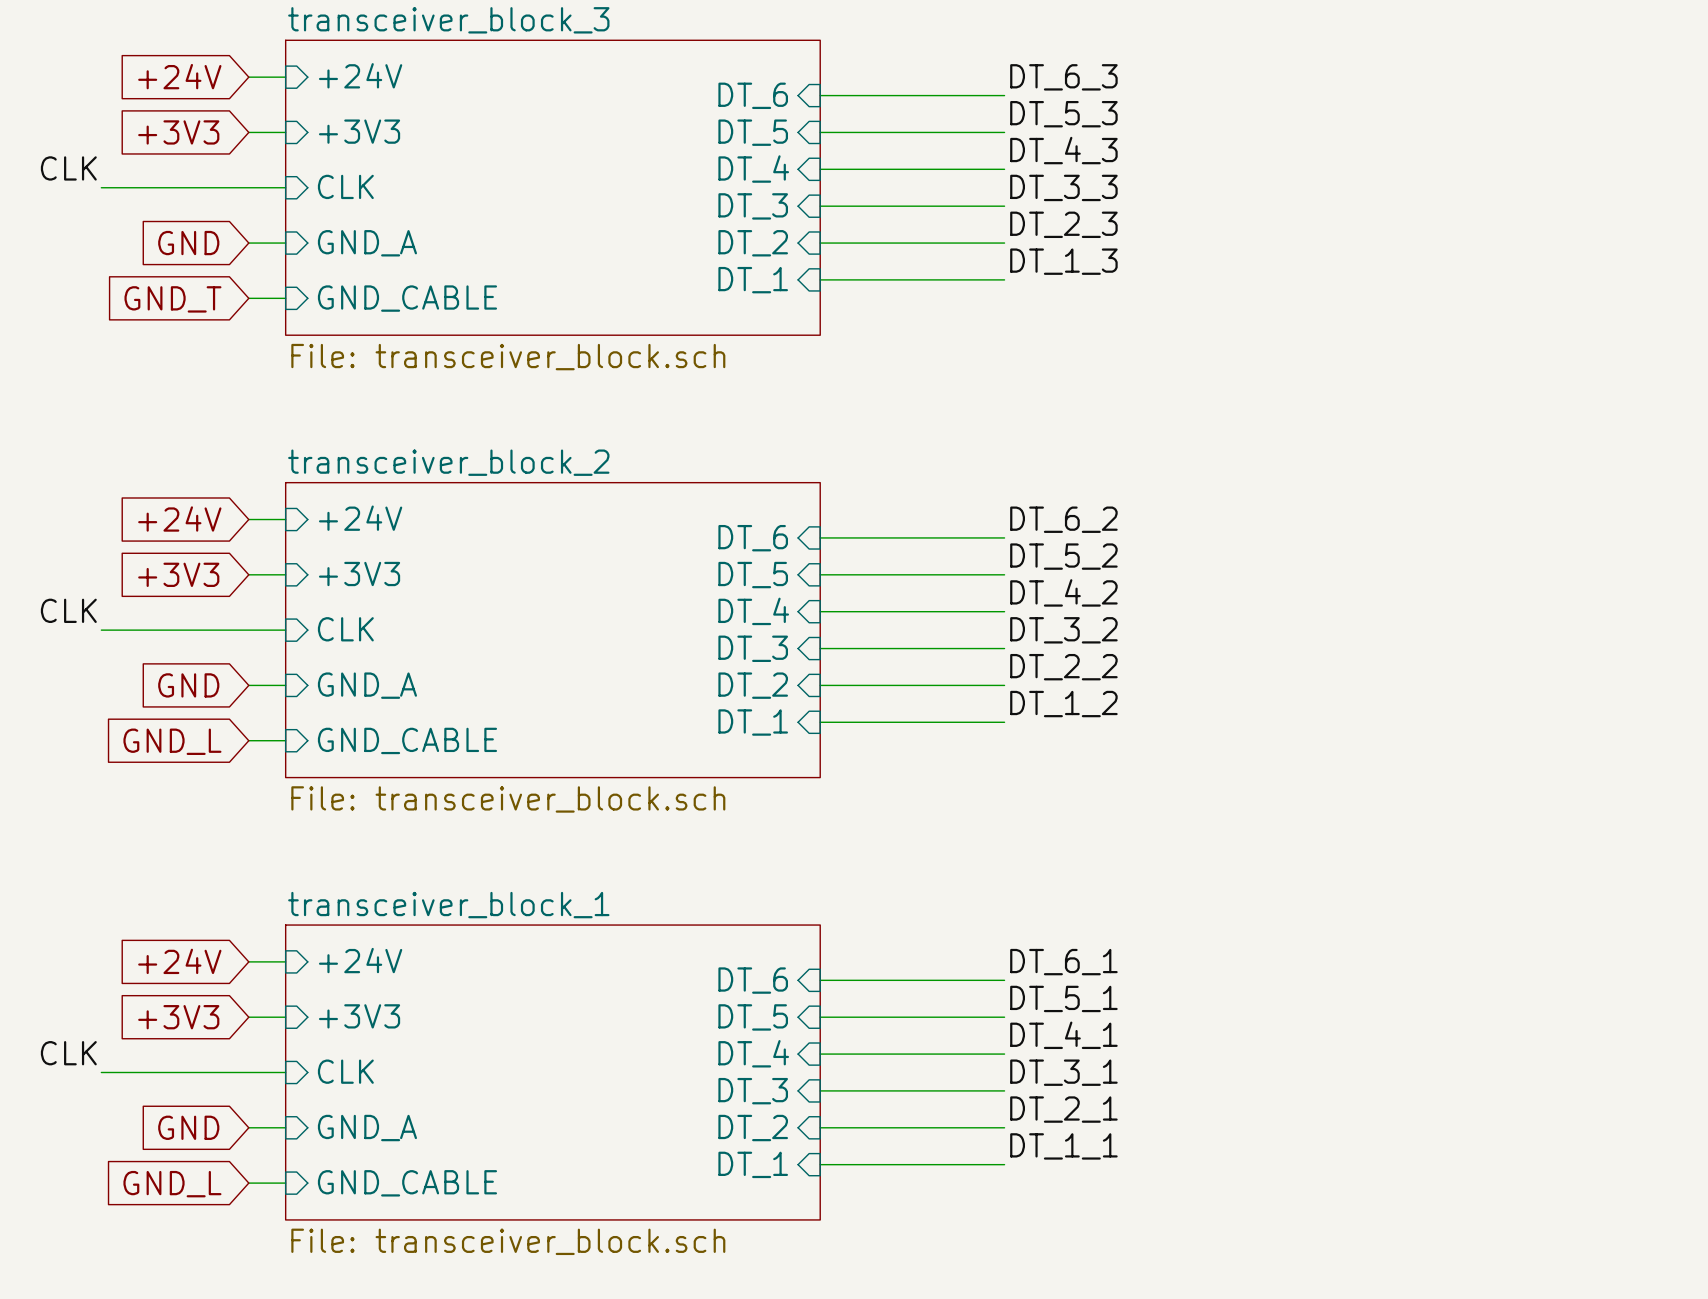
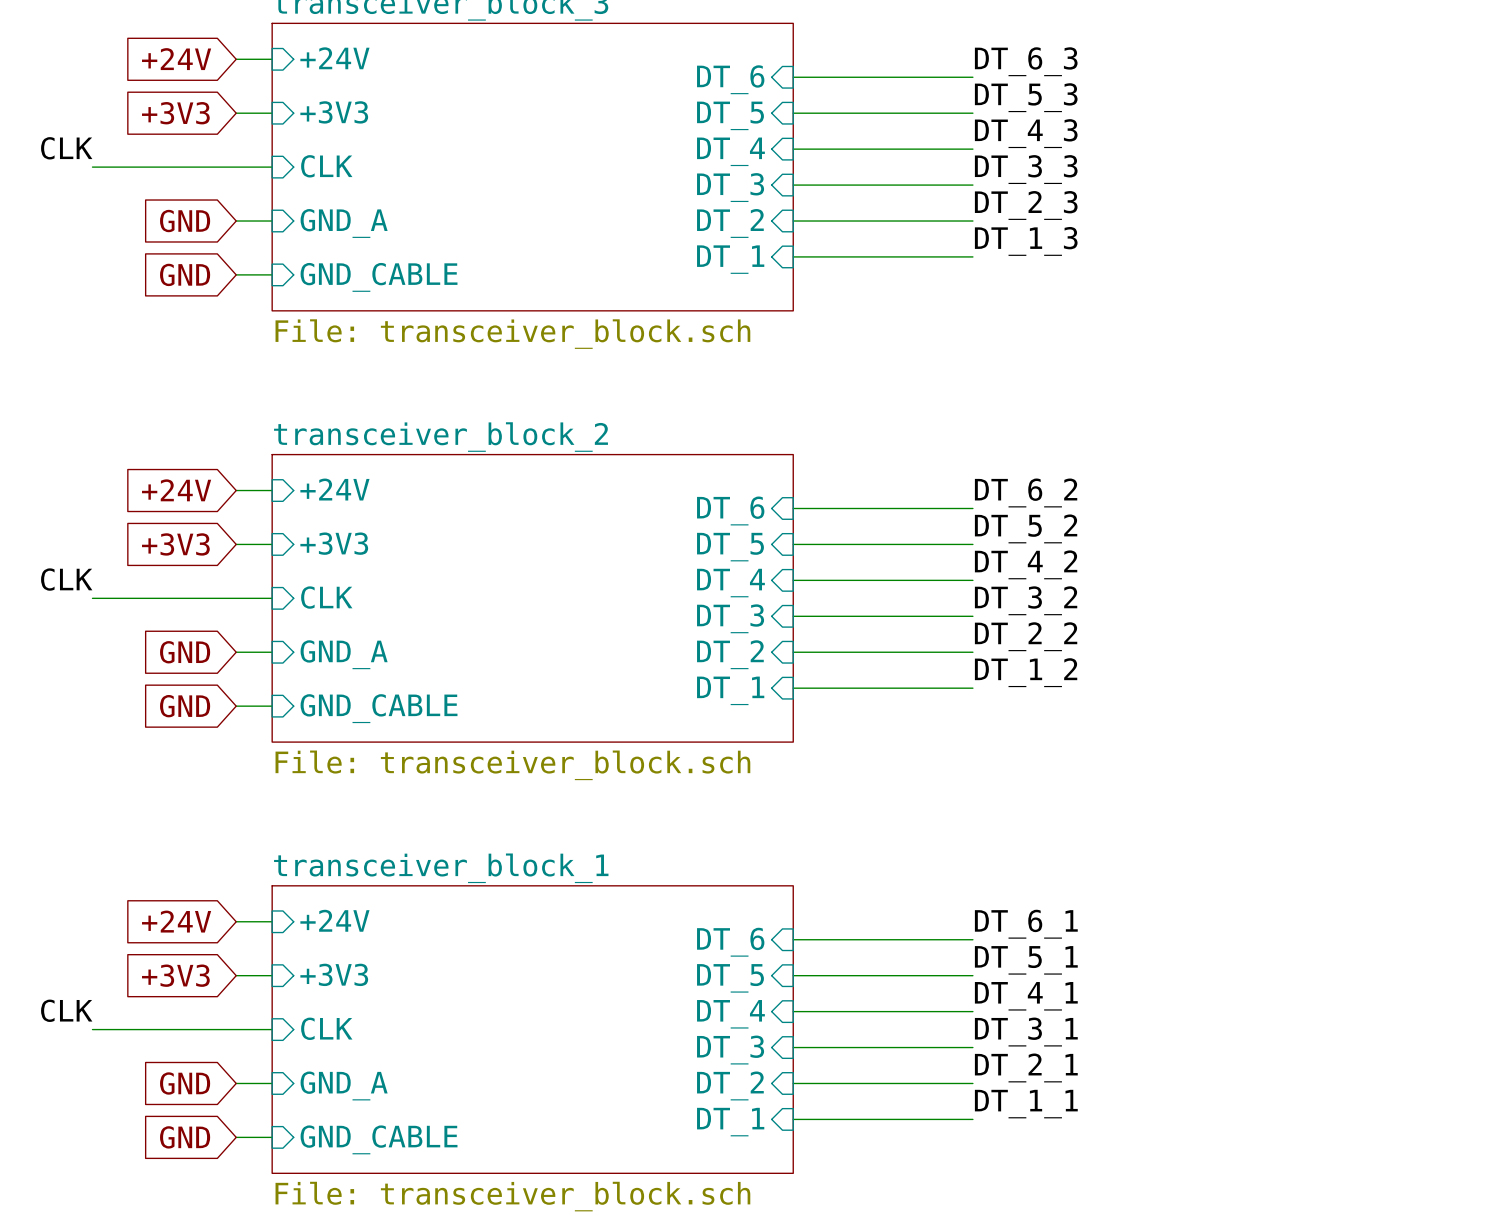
global label: GND_T (172, 299) -> GND (185, 274)
global label: GND_L (172, 741) -> GND (185, 706)
global label: GND_L (172, 1184) -> GND (185, 1137)

